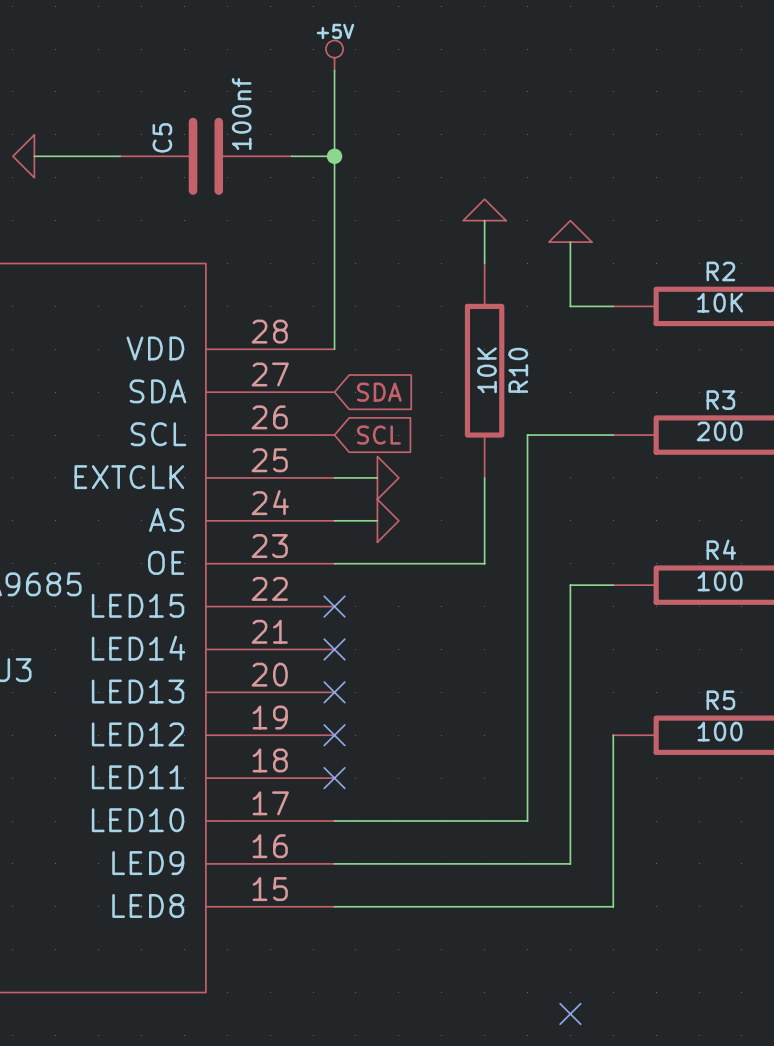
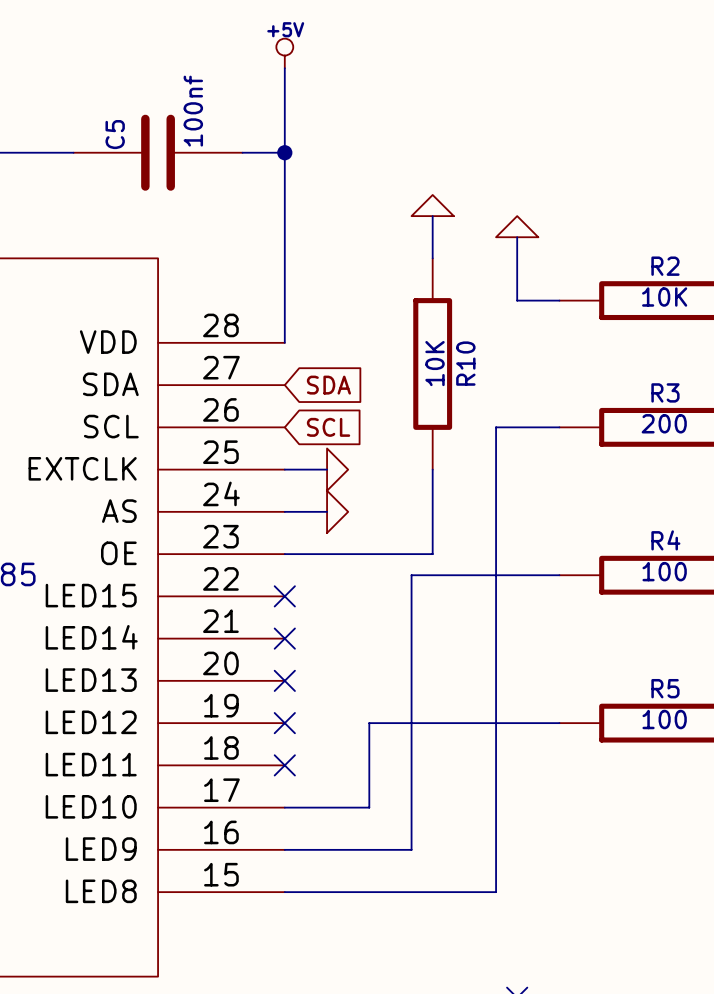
wire: (548, 435) (527, 435) (527, 821) (420, 821) -> (496, 427) (496, 892)
wire: (570, 585) (570, 863) (463, 863) -> (517, 575) (411, 575) (411, 849)
wire: (613, 735) (613, 906) (548, 906) -> (559, 723) (369, 723) (369, 807)

